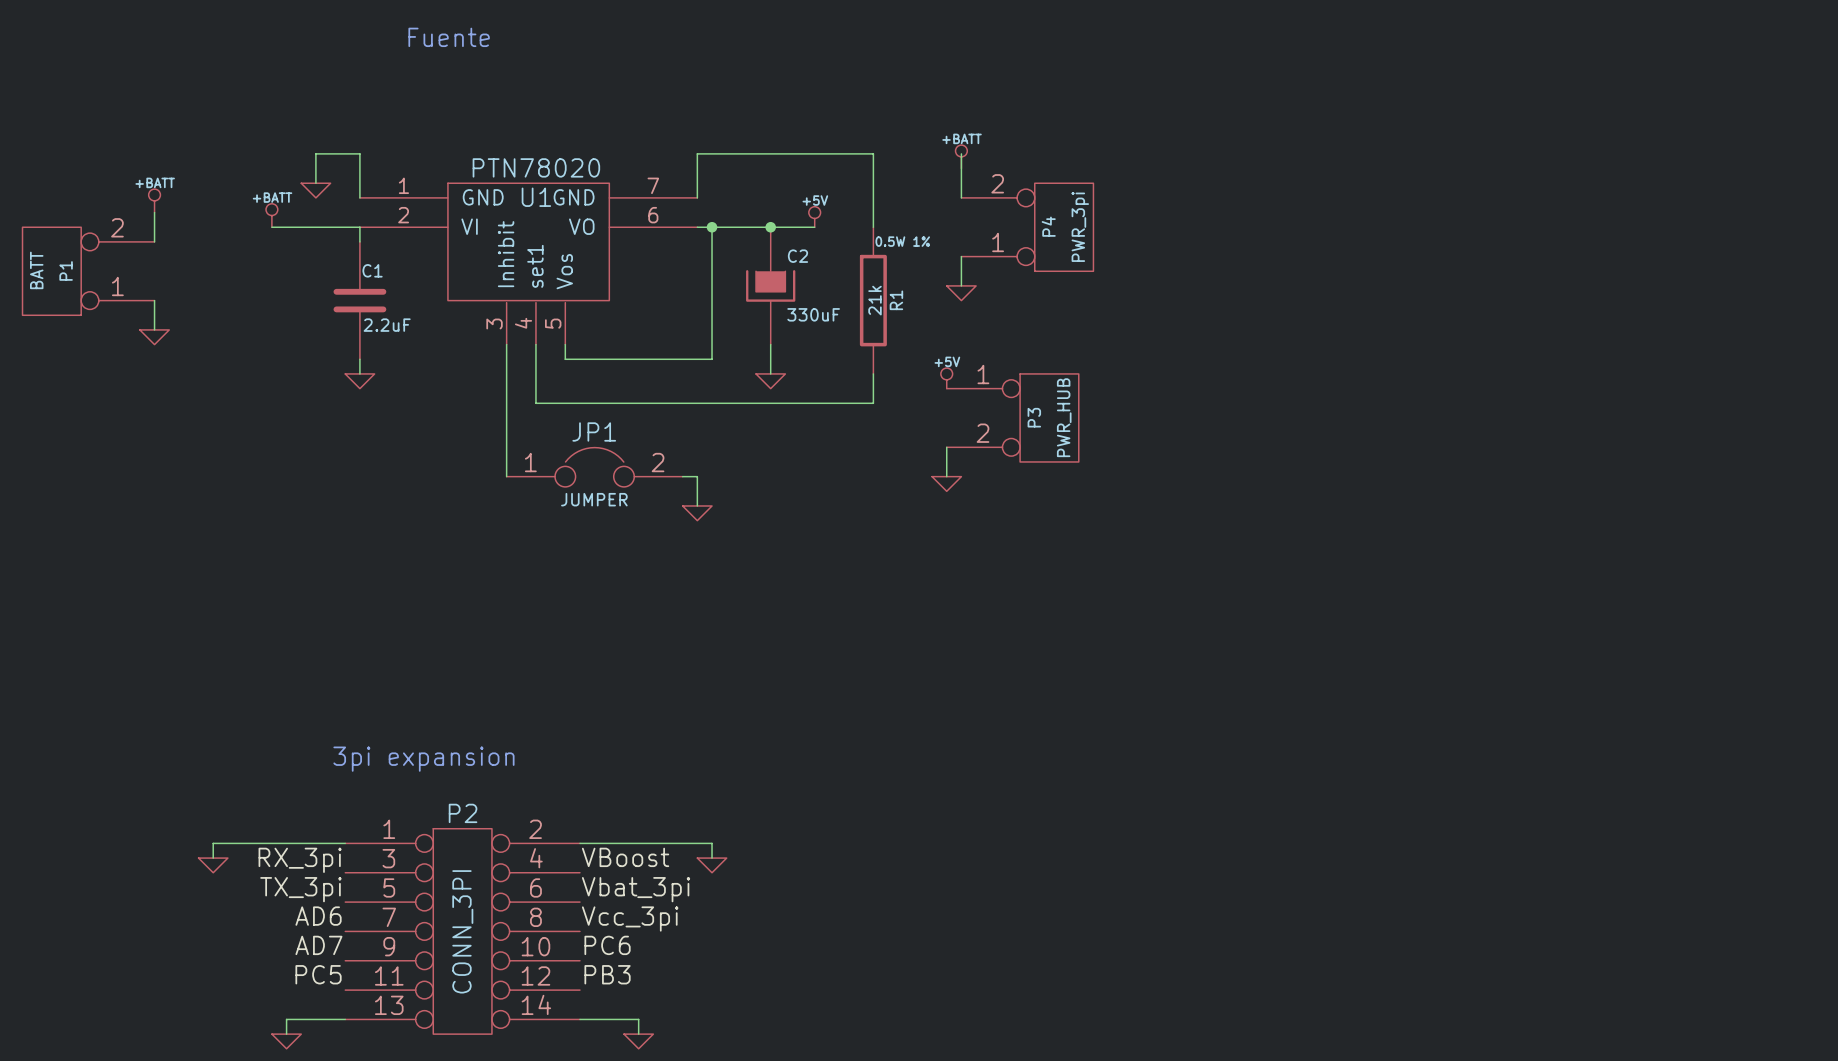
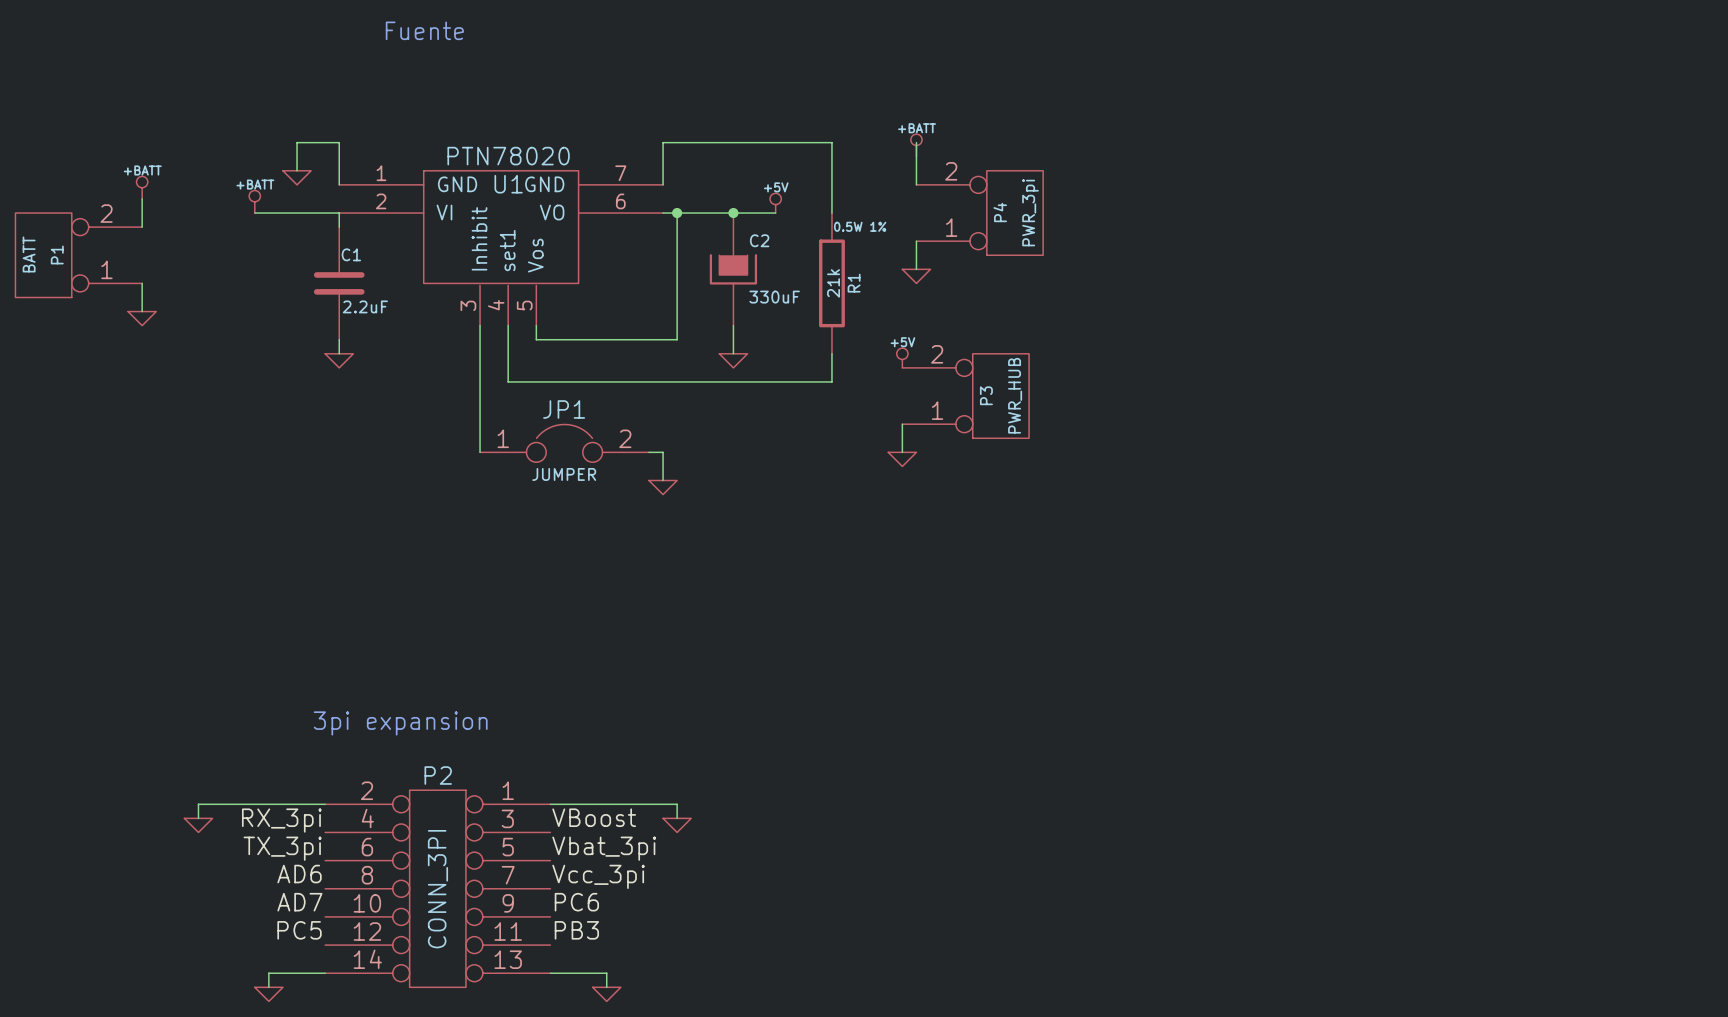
P3 flip: as is (1049, 417) -> up-down (1000, 396)
P2 flip: as is (462, 931) -> left-right (437, 888)

